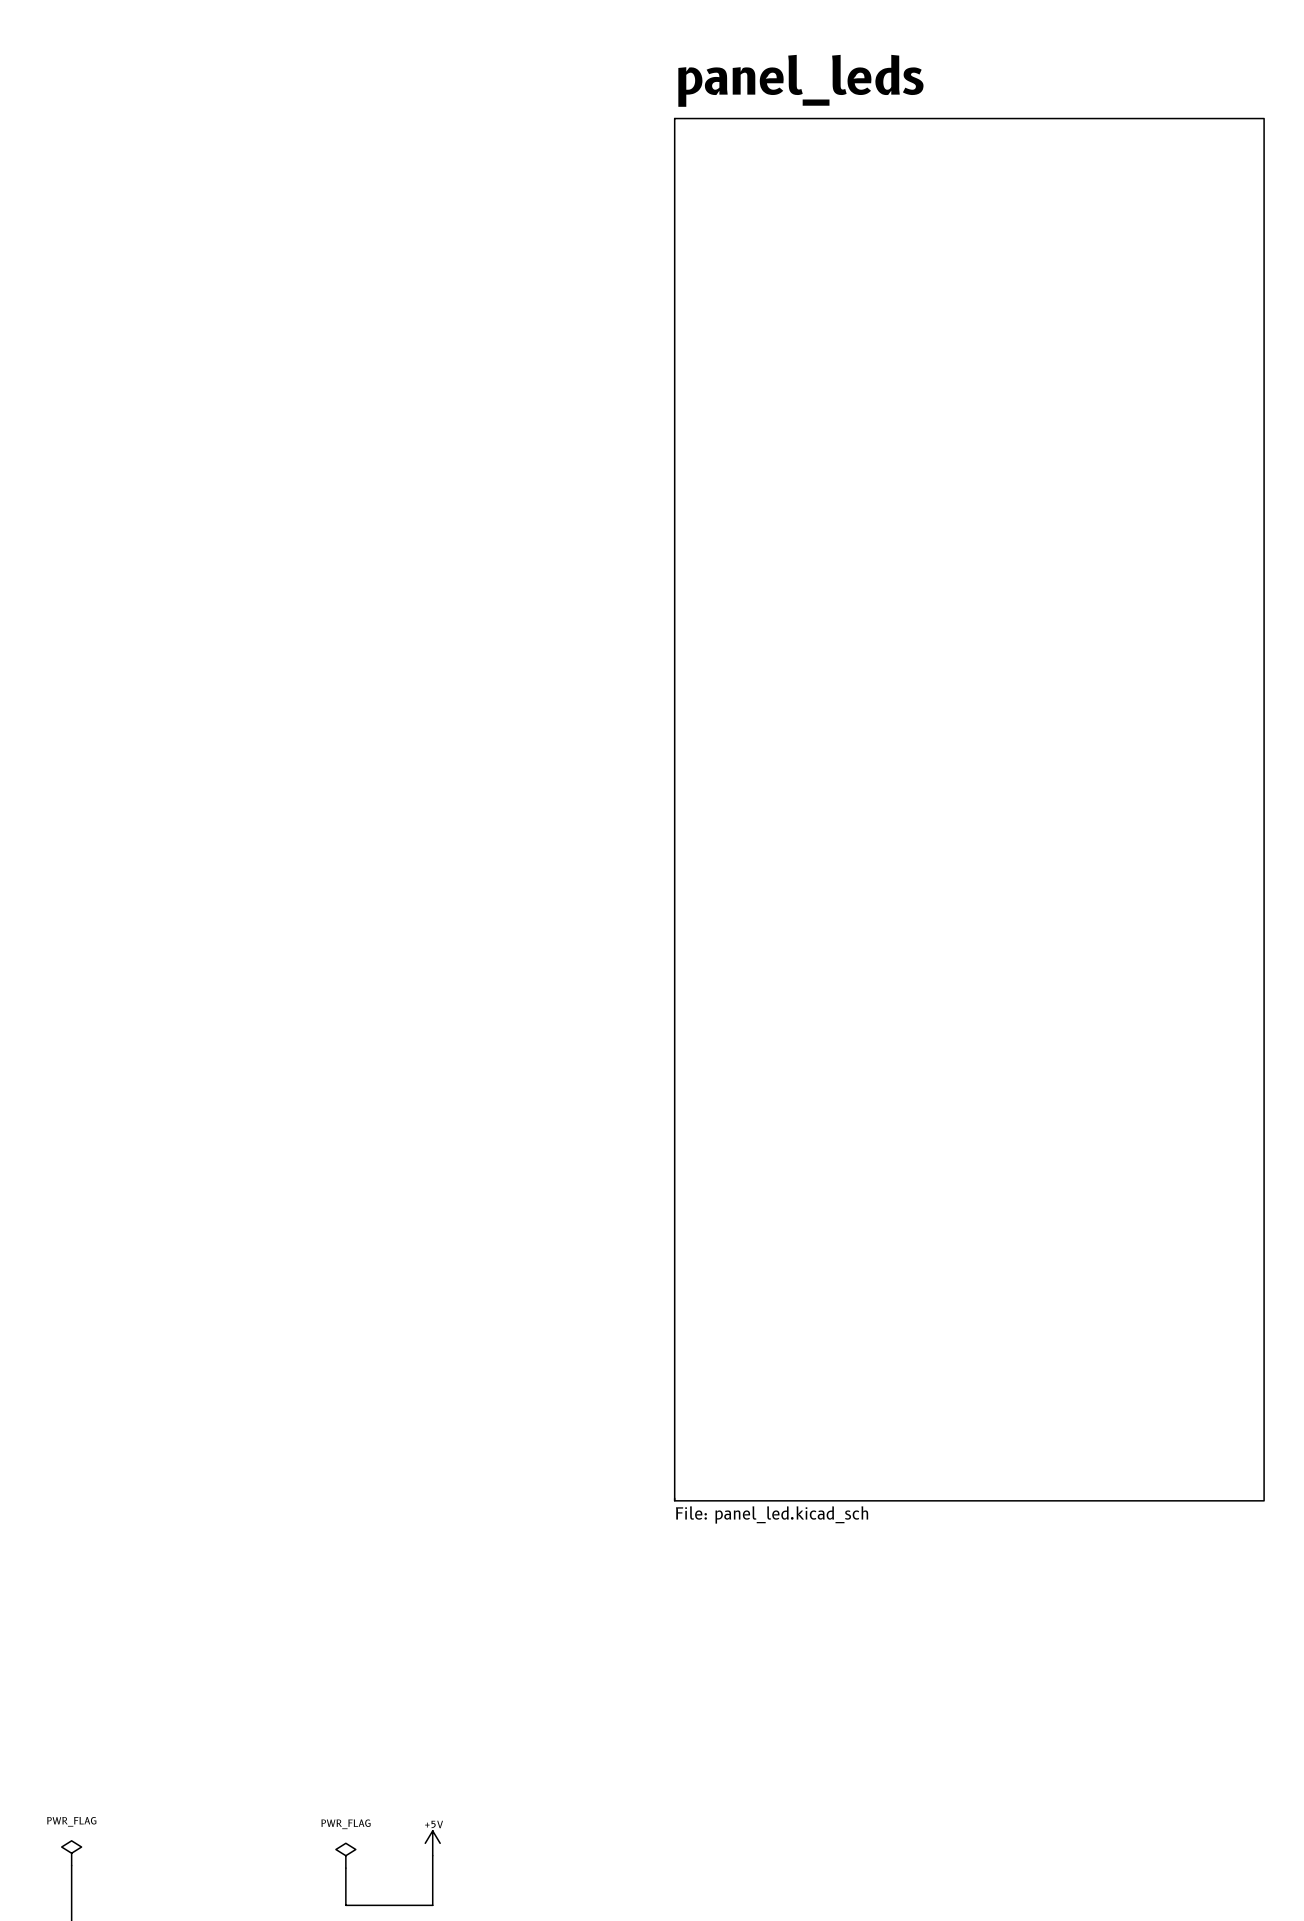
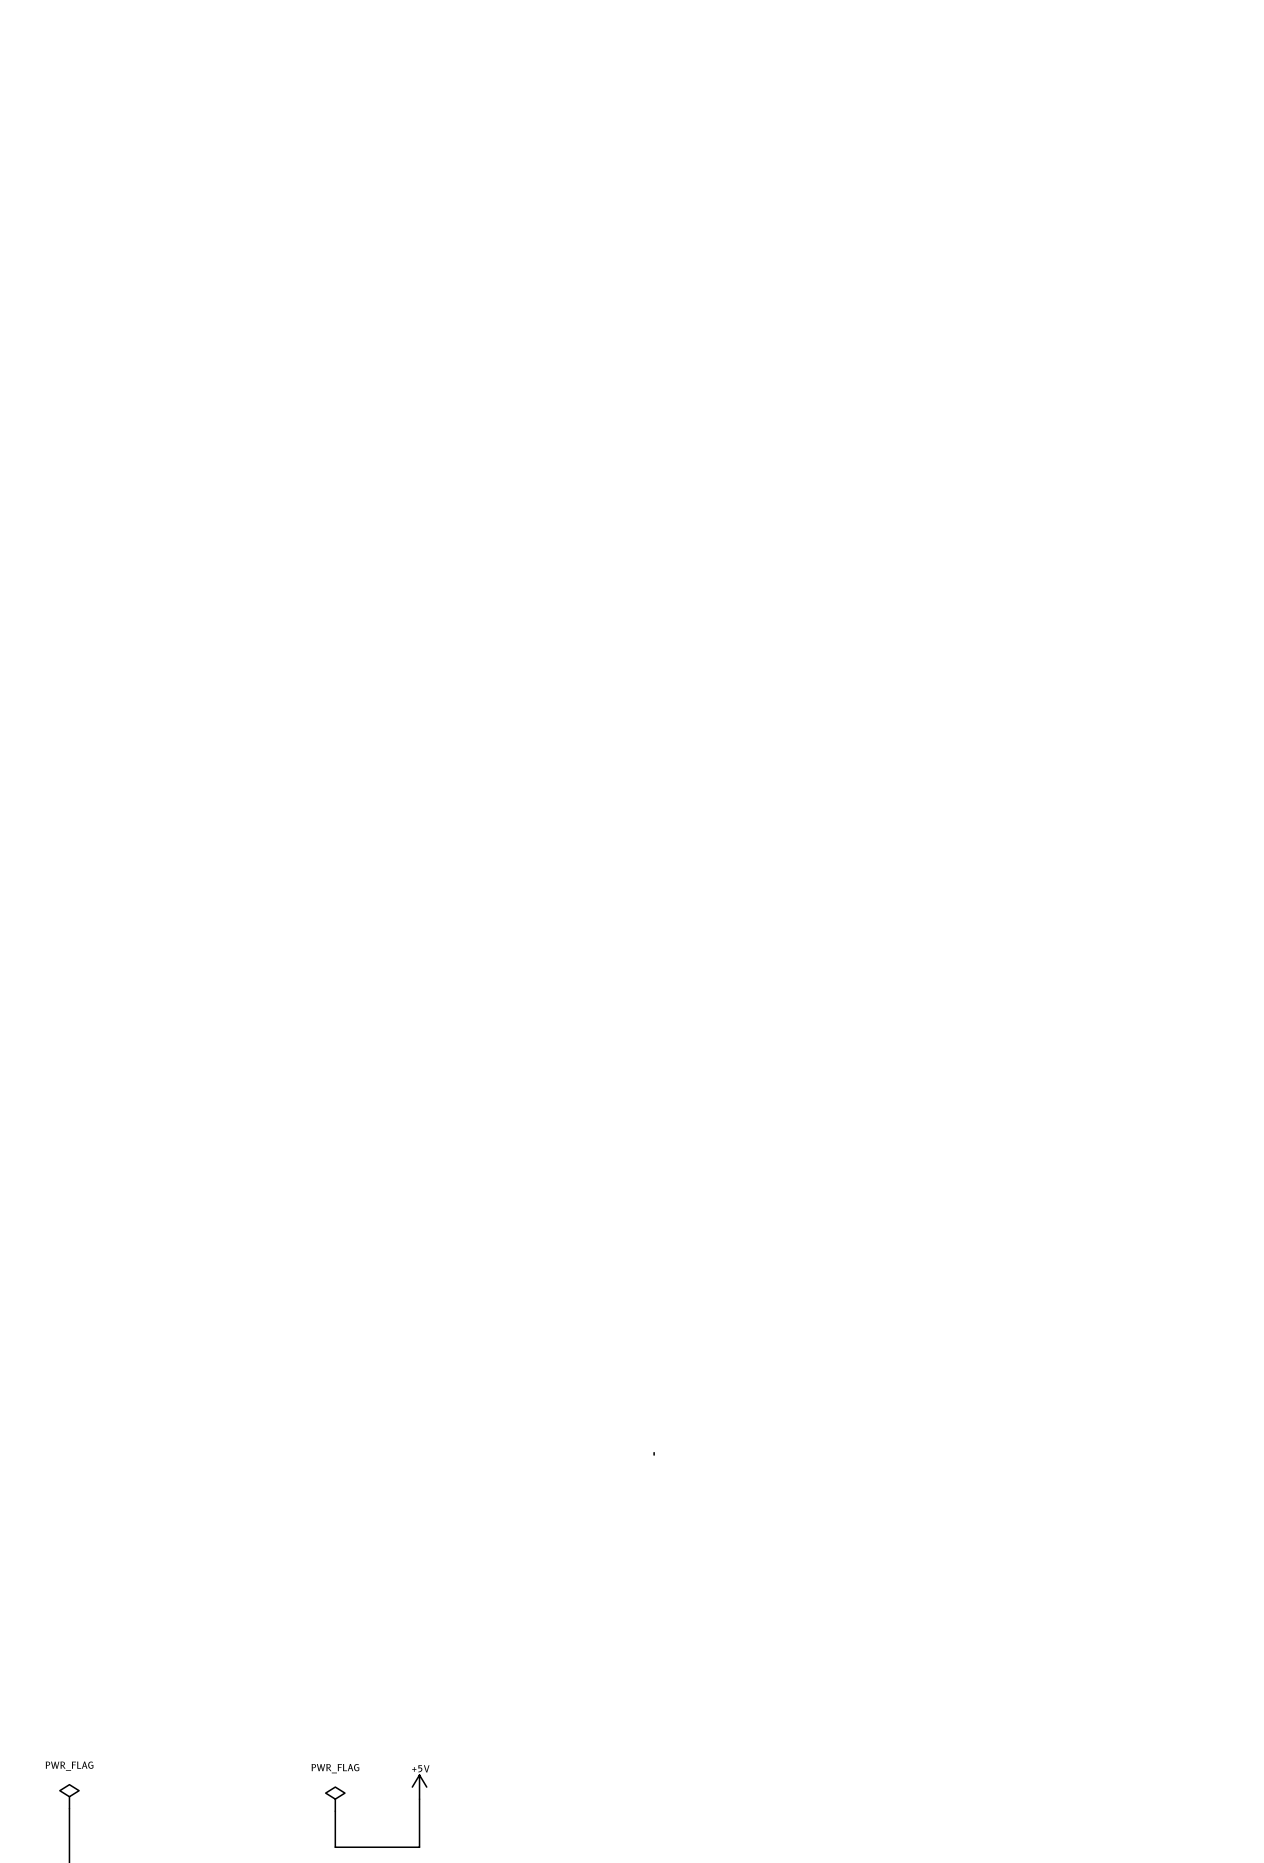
sheet panel_leds: File: panel_led.kicad_sch (969, 809) -> none

